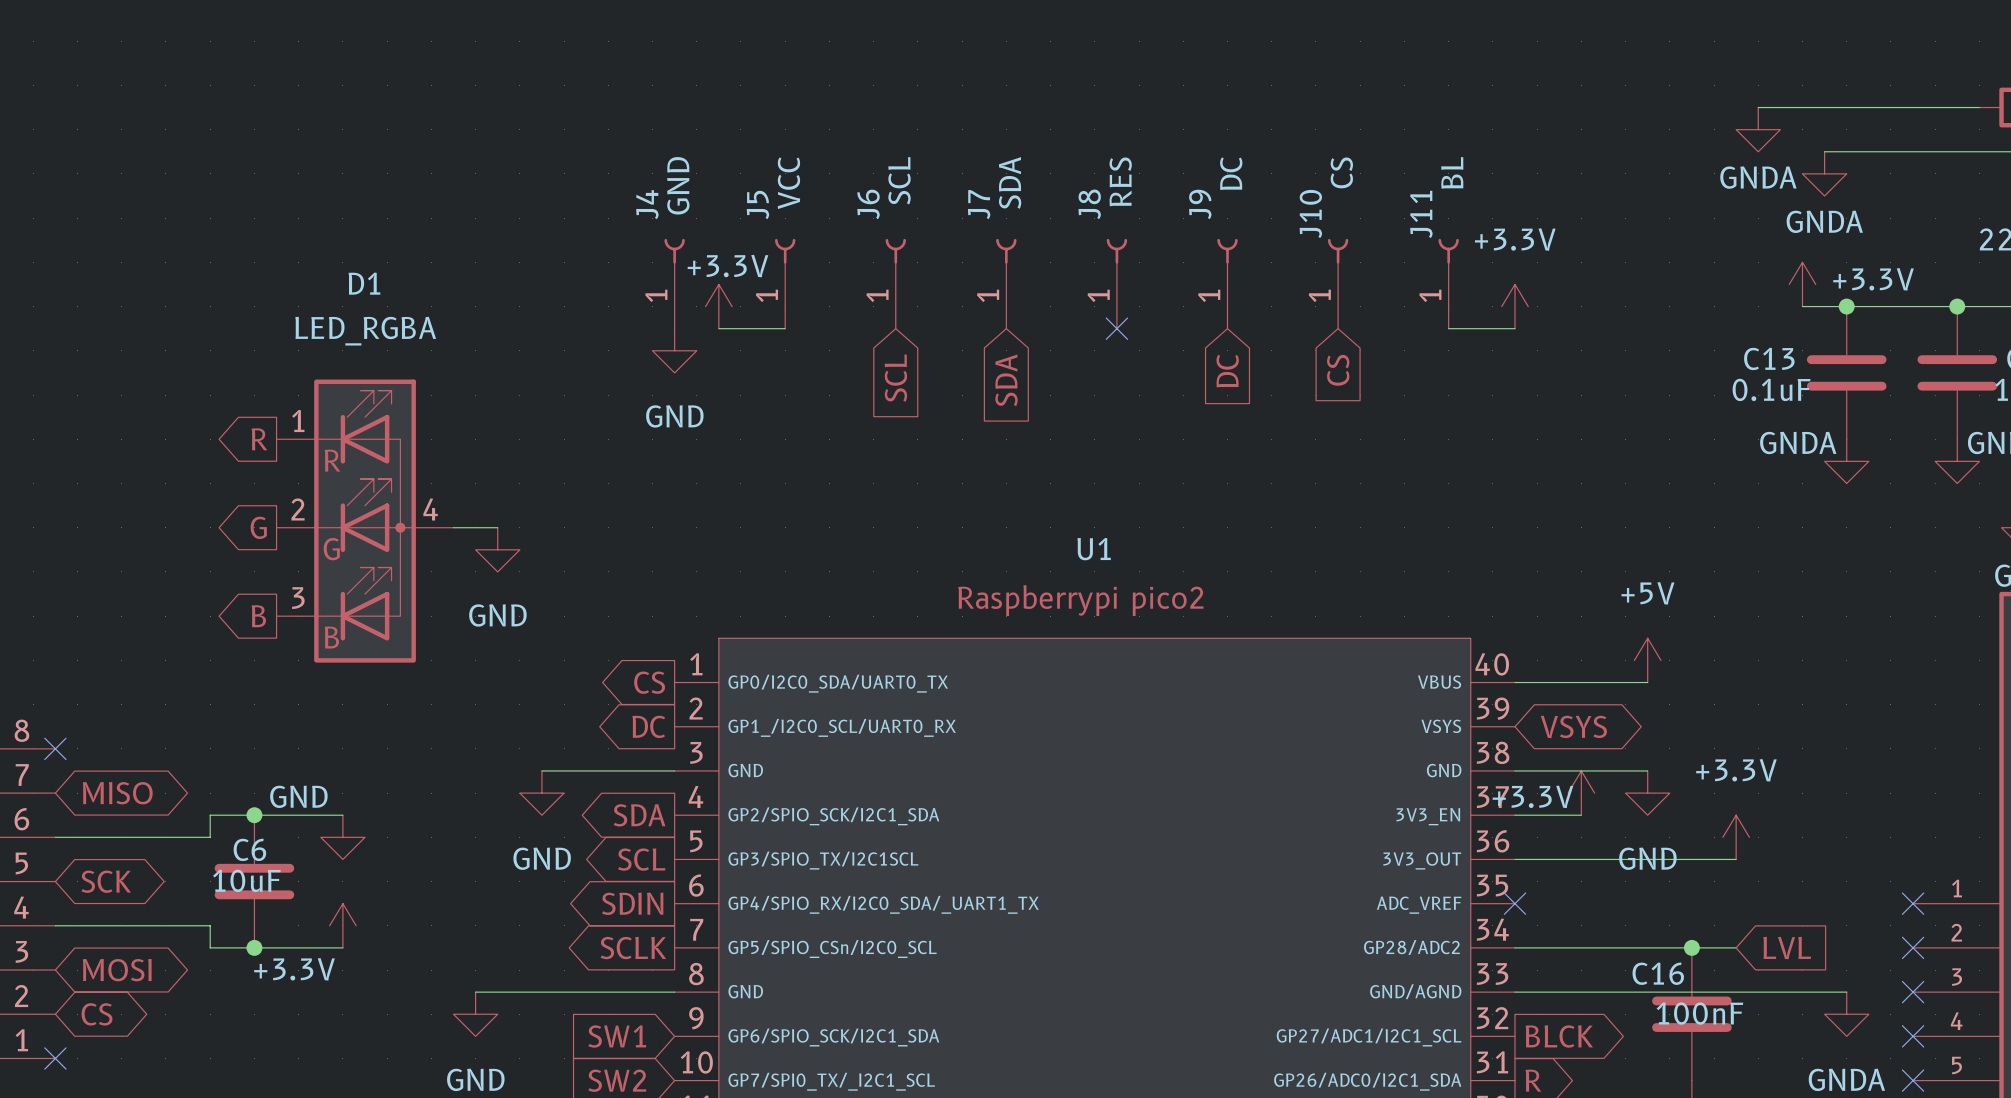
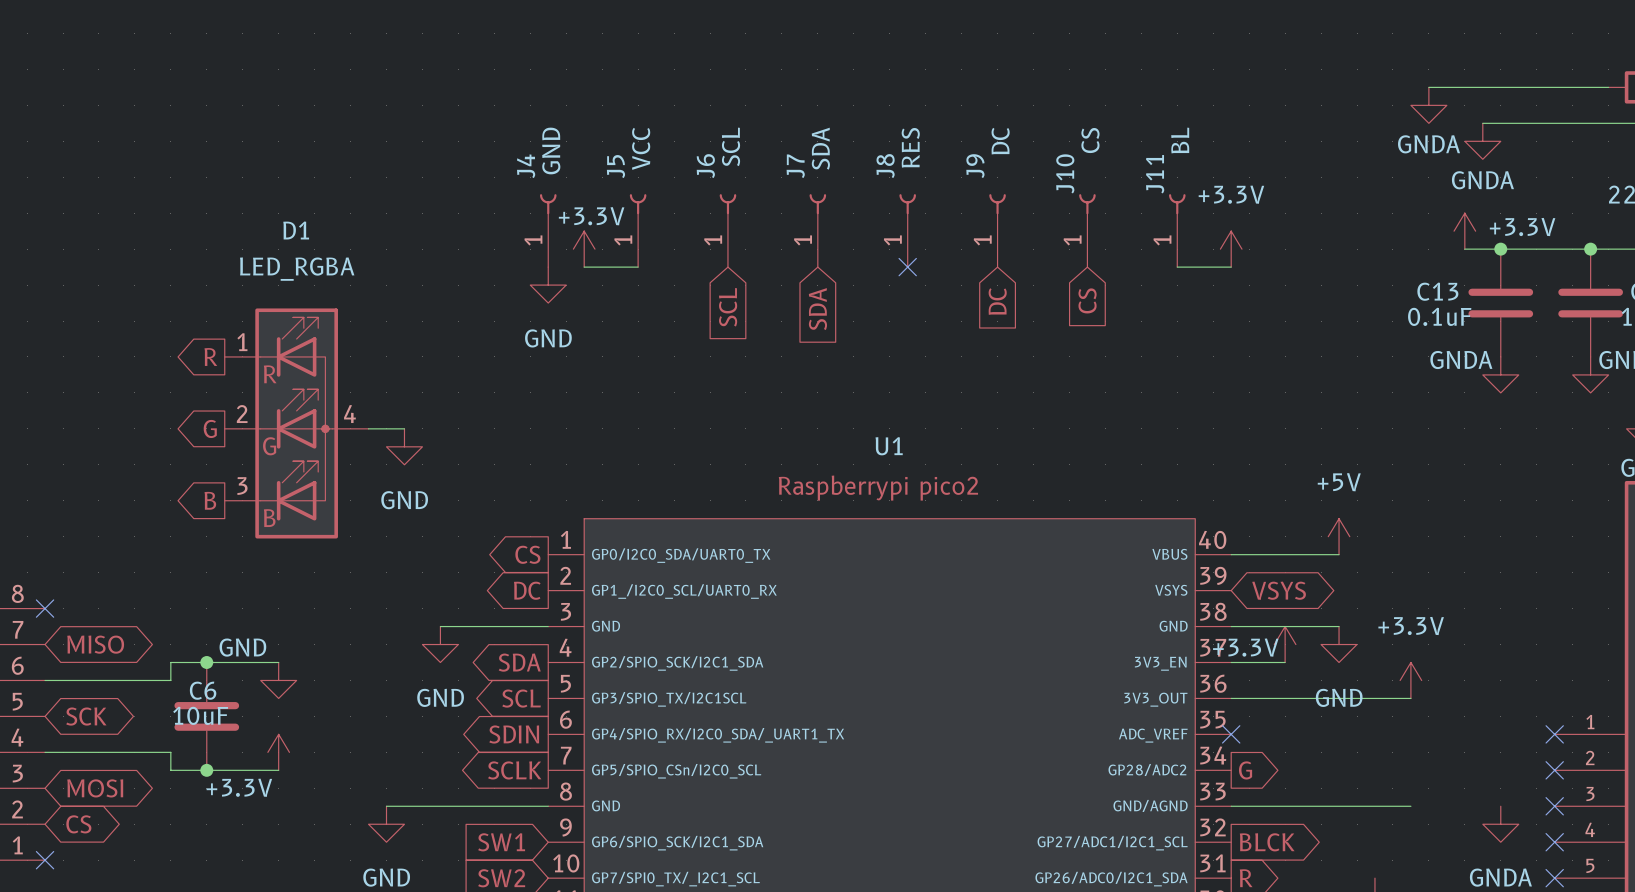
wire: (1514, 947) (1736, 947) -> none
junction: (1691, 947) -> none
global label: none -> G (1245, 770)
global label: LVL (1787, 948) -> none
wire: (1736, 992) (1846, 992) -> none
C16: 100nF (1691, 1014) -> none

